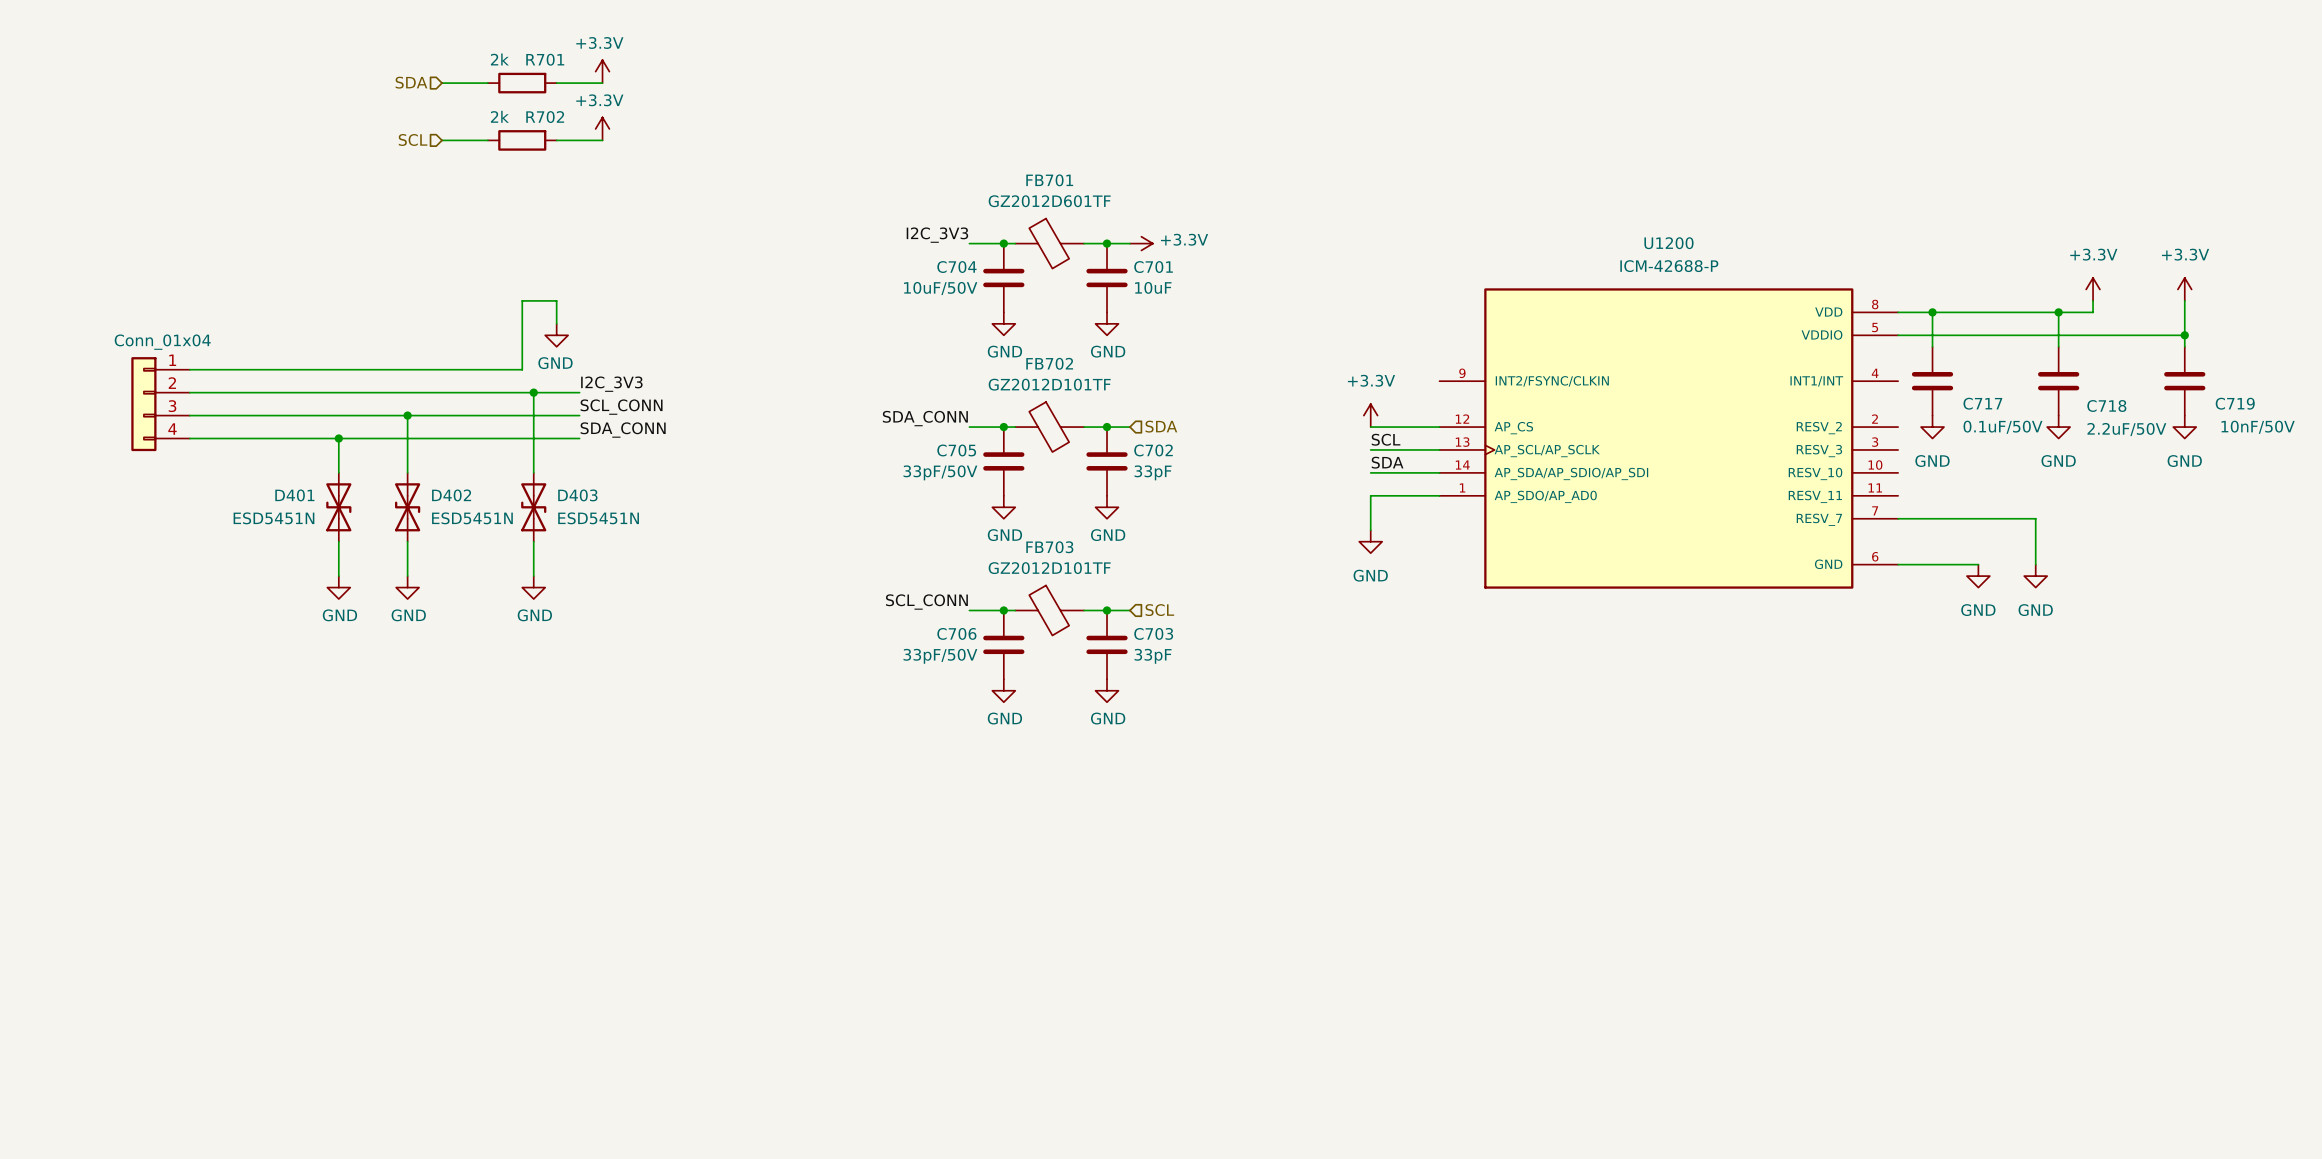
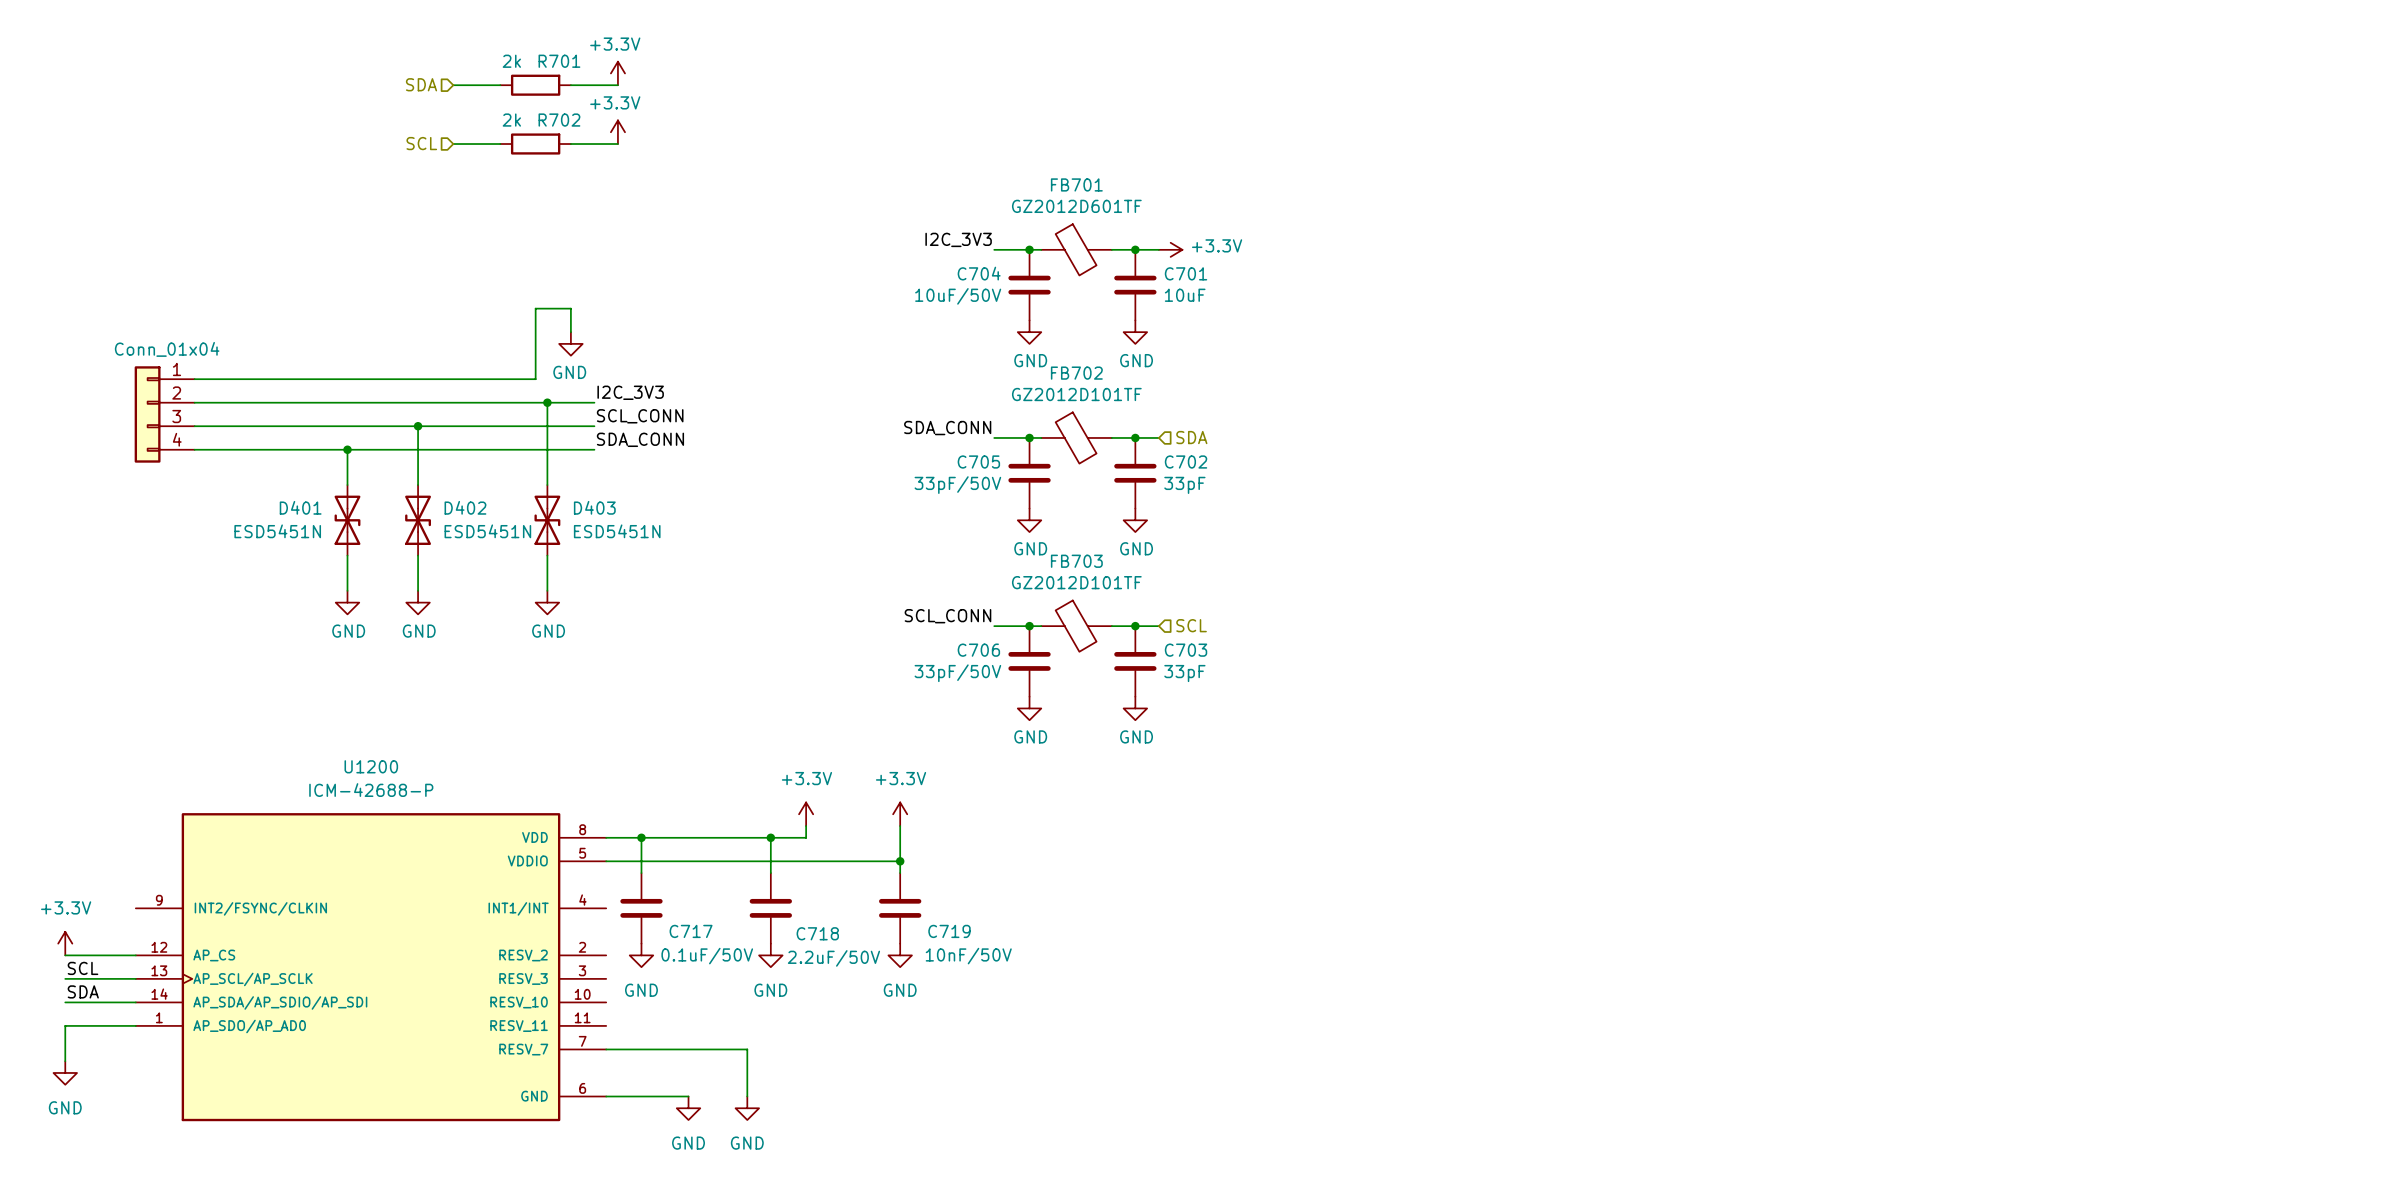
power symbol: +3.3V (2093, 289) -> none
power symbol: +3.3V (2184, 289) -> none
wire: (2093, 300) (2093, 312) (1898, 312) -> none
wire: (2184, 300) (2184, 346) -> none
wire: (1932, 312) (1932, 346) -> none
junction: (1932, 312) -> none
wire: (2058, 312) (2058, 346) -> none
junction: (2058, 312) -> none
wire: (1898, 335) (2184, 335) -> none
junction: (2184, 335) -> none
C717 position: (1932, 381) -> (641, 908)
C718 position: (2058, 381) -> (770, 908)
C719 position: (2184, 381) -> (900, 908)
power symbol: +3.3V (1370, 415) -> none
wire: (1370, 427) (1439, 427) -> none
power symbol: GND (1932, 427) -> none
power symbol: GND (2058, 427) -> none
power symbol: GND (2184, 427) -> none
U1200 position: (1668, 438) -> (371, 967)
label: SCL (1386, 439) -> none
wire: (1370, 449) (1439, 449) -> none
label: SDA (1387, 462) -> none
wire: (1370, 472) (1439, 472) -> none
wire: (1439, 495) (1370, 495) (1370, 530) -> none
wire: (1898, 518) (2035, 518) (2035, 564) -> none
power symbol: GND (1370, 541) -> none
wire: (1898, 564) (1978, 564) -> none
power symbol: GND (1978, 576) -> none
power symbol: GND (2035, 576) -> none
power symbol: none -> +3.3V (806, 814)
power symbol: none -> +3.3V (900, 814)
wire: none -> (806, 826) (806, 837) (606, 837)
wire: none -> (900, 826) (900, 873)
wire: none -> (641, 837) (641, 873)
junction: none -> (641, 837)
wire: none -> (770, 837) (770, 873)
junction: none -> (770, 837)
wire: none -> (606, 861) (900, 861)
junction: none -> (900, 861)
power symbol: none -> +3.3V (65, 943)
wire: none -> (65, 955) (135, 955)
power symbol: none -> GND (641, 955)
power symbol: none -> GND (770, 955)
power symbol: none -> GND (900, 955)
label: none -> SCL (83, 968)
wire: none -> (65, 978) (135, 978)
label: none -> SDA (83, 991)
wire: none -> (65, 1002) (135, 1002)
wire: none -> (135, 1025) (65, 1025) (65, 1061)
wire: none -> (606, 1049) (747, 1049) (747, 1096)
power symbol: none -> GND (65, 1072)
wire: none -> (606, 1096) (688, 1096)
power symbol: none -> GND (688, 1108)
power symbol: none -> GND (747, 1108)

